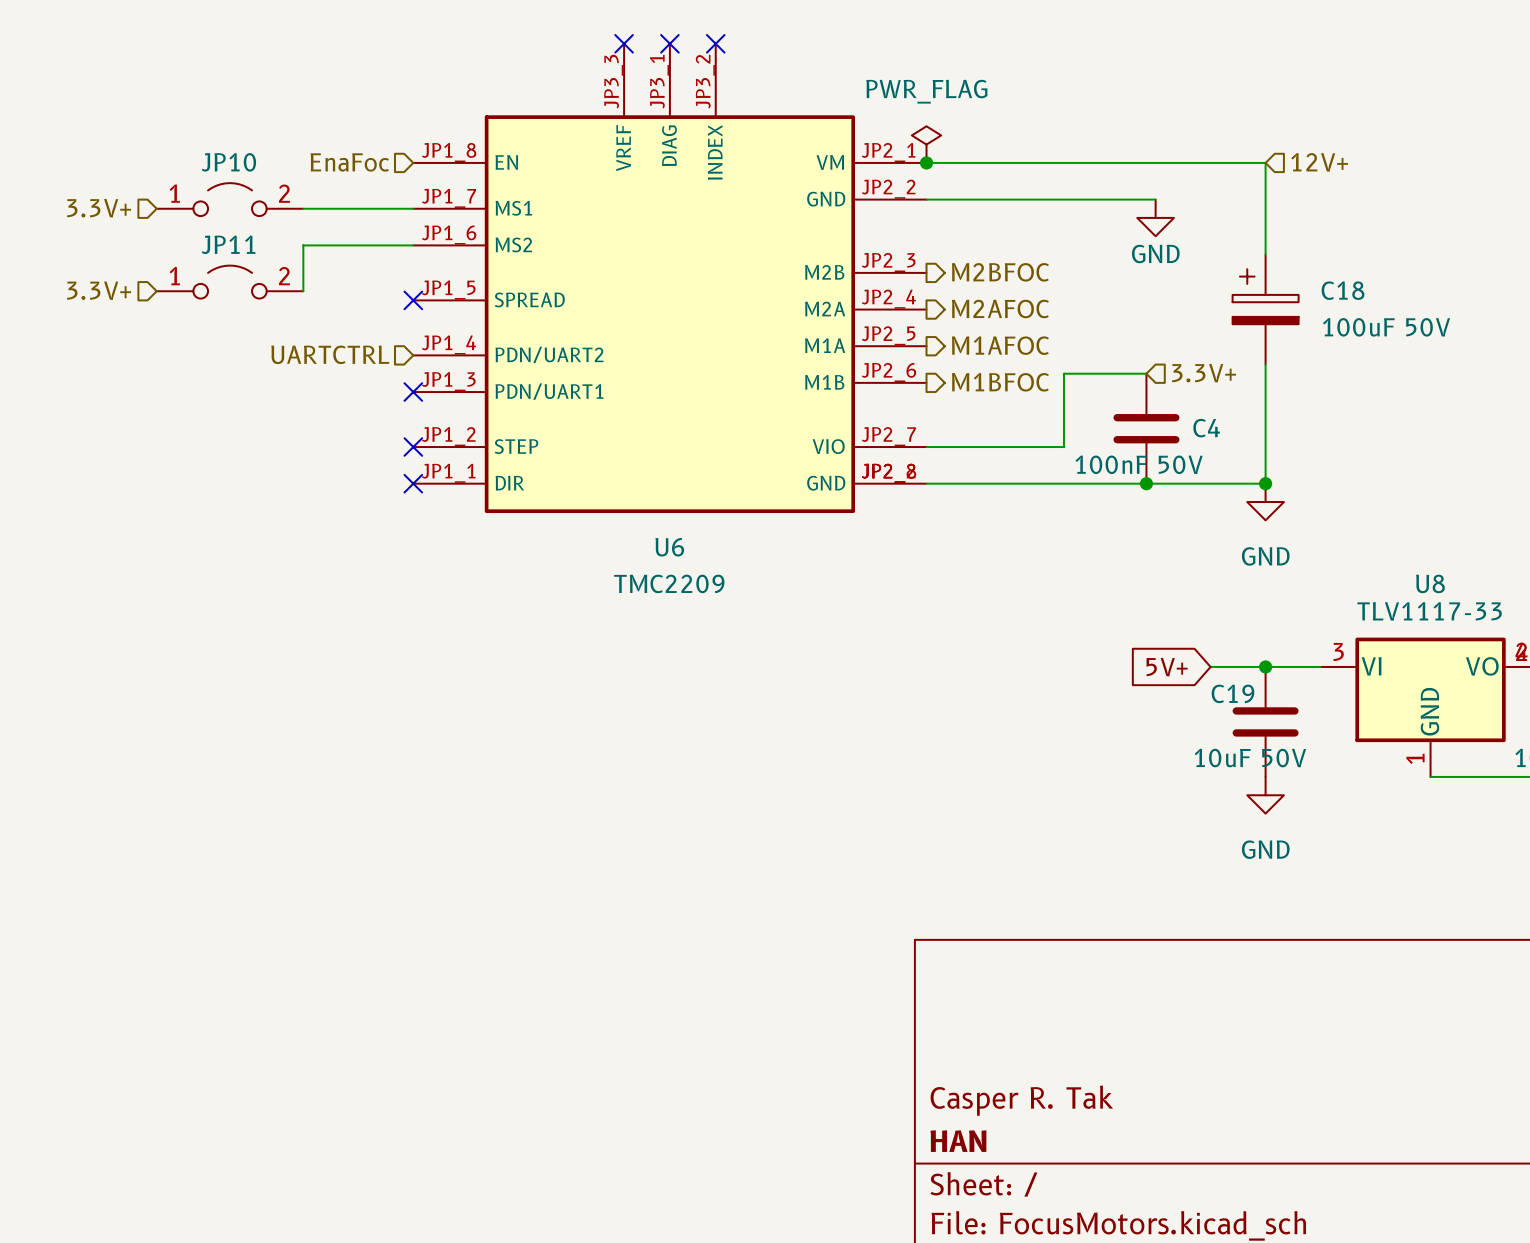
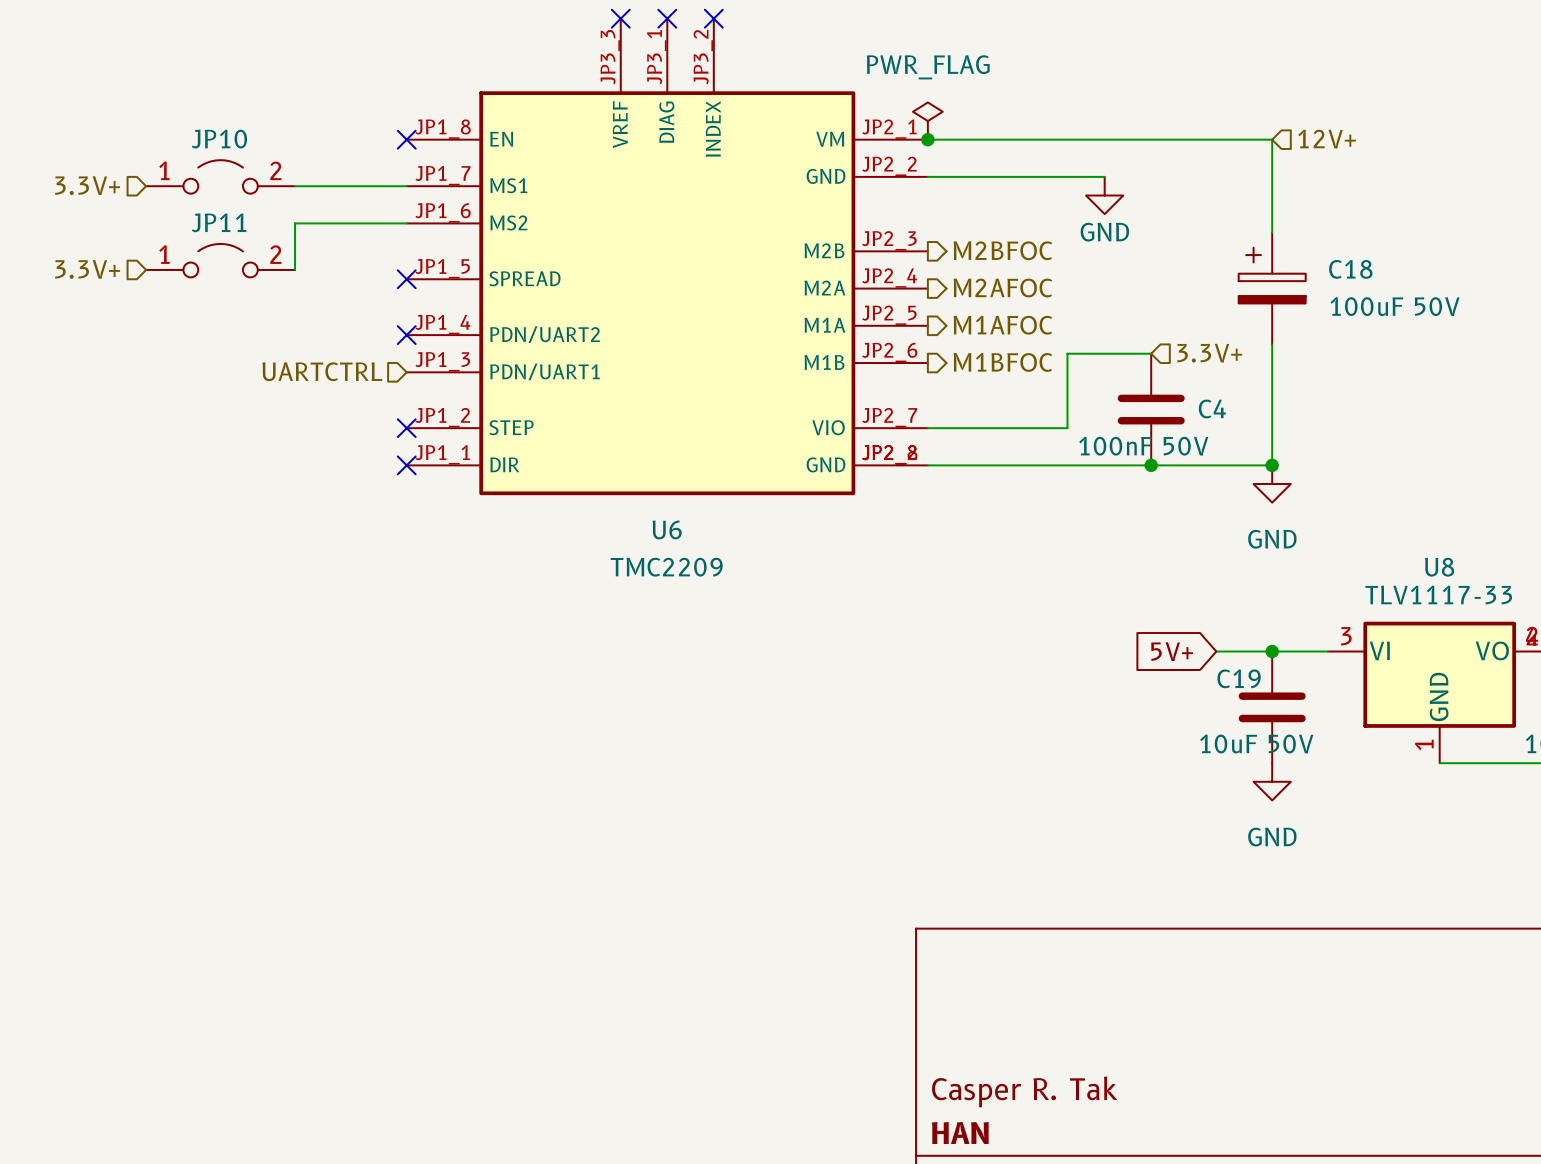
hierarchical label: EnaFoc (349, 162) -> none
no-connect mark: none -> (406, 139)
wire: (1100, 199) (1155, 199) -> none
power symbol position: GND (1155, 217) -> GND (1104, 195)
hierarchical label position: UARTCTRL (330, 354) -> UARTCTRL (322, 371)
no-connect mark position: (413, 392) -> (406, 335)

